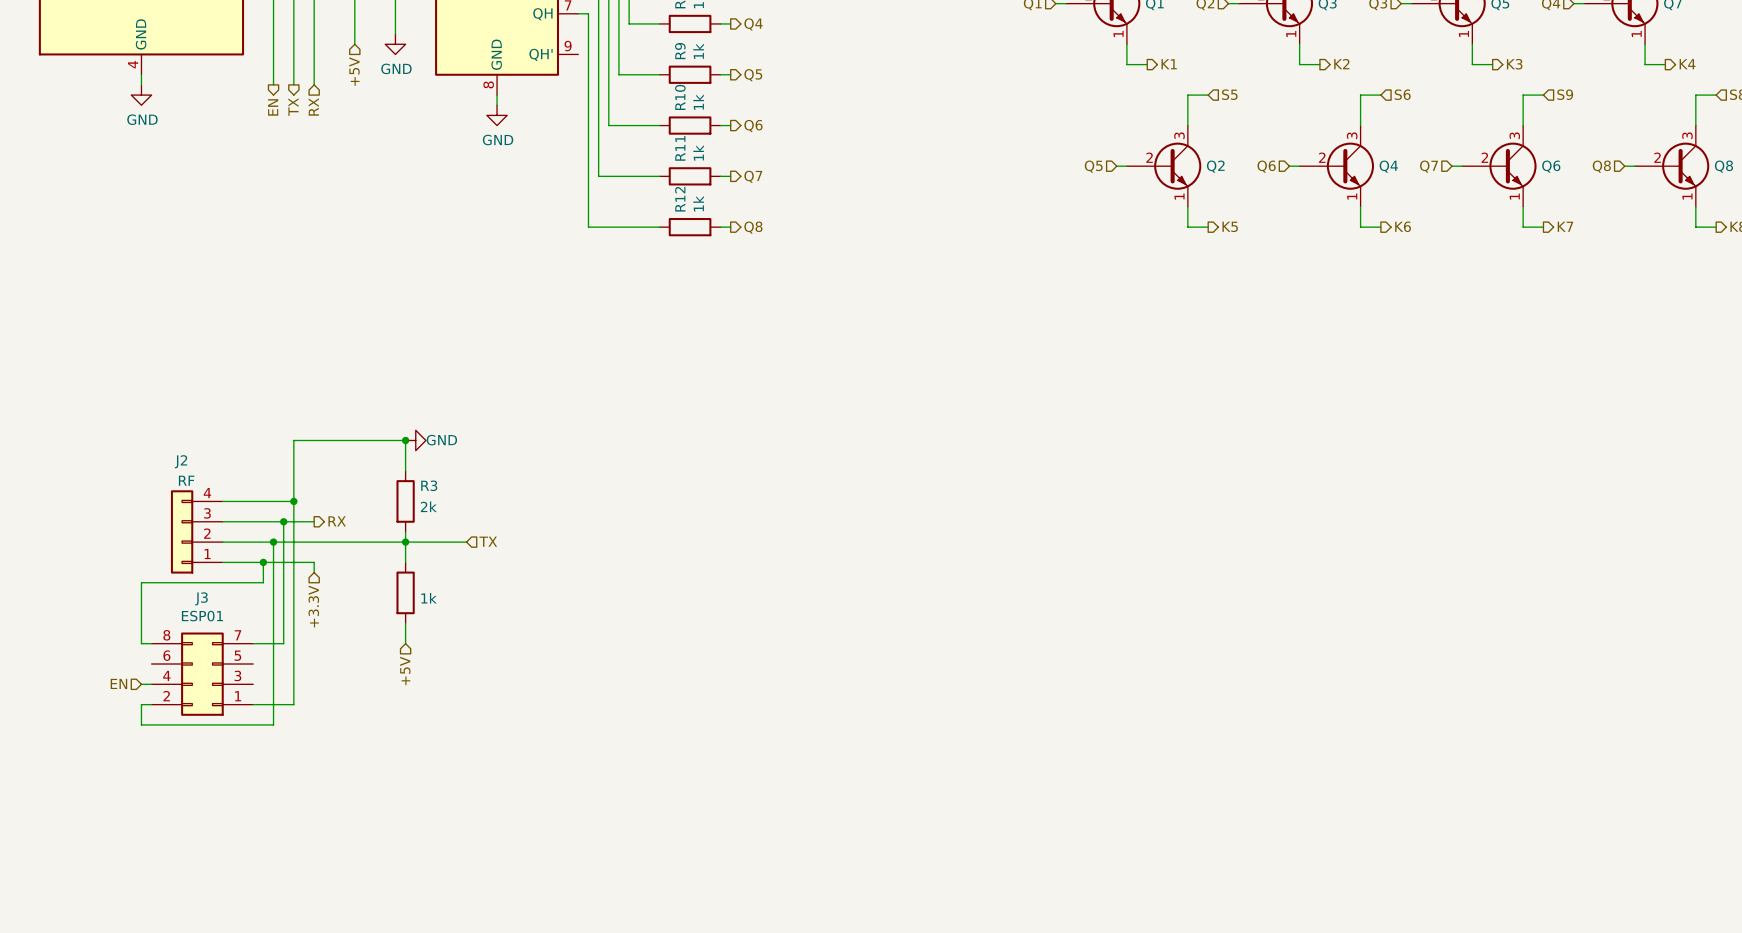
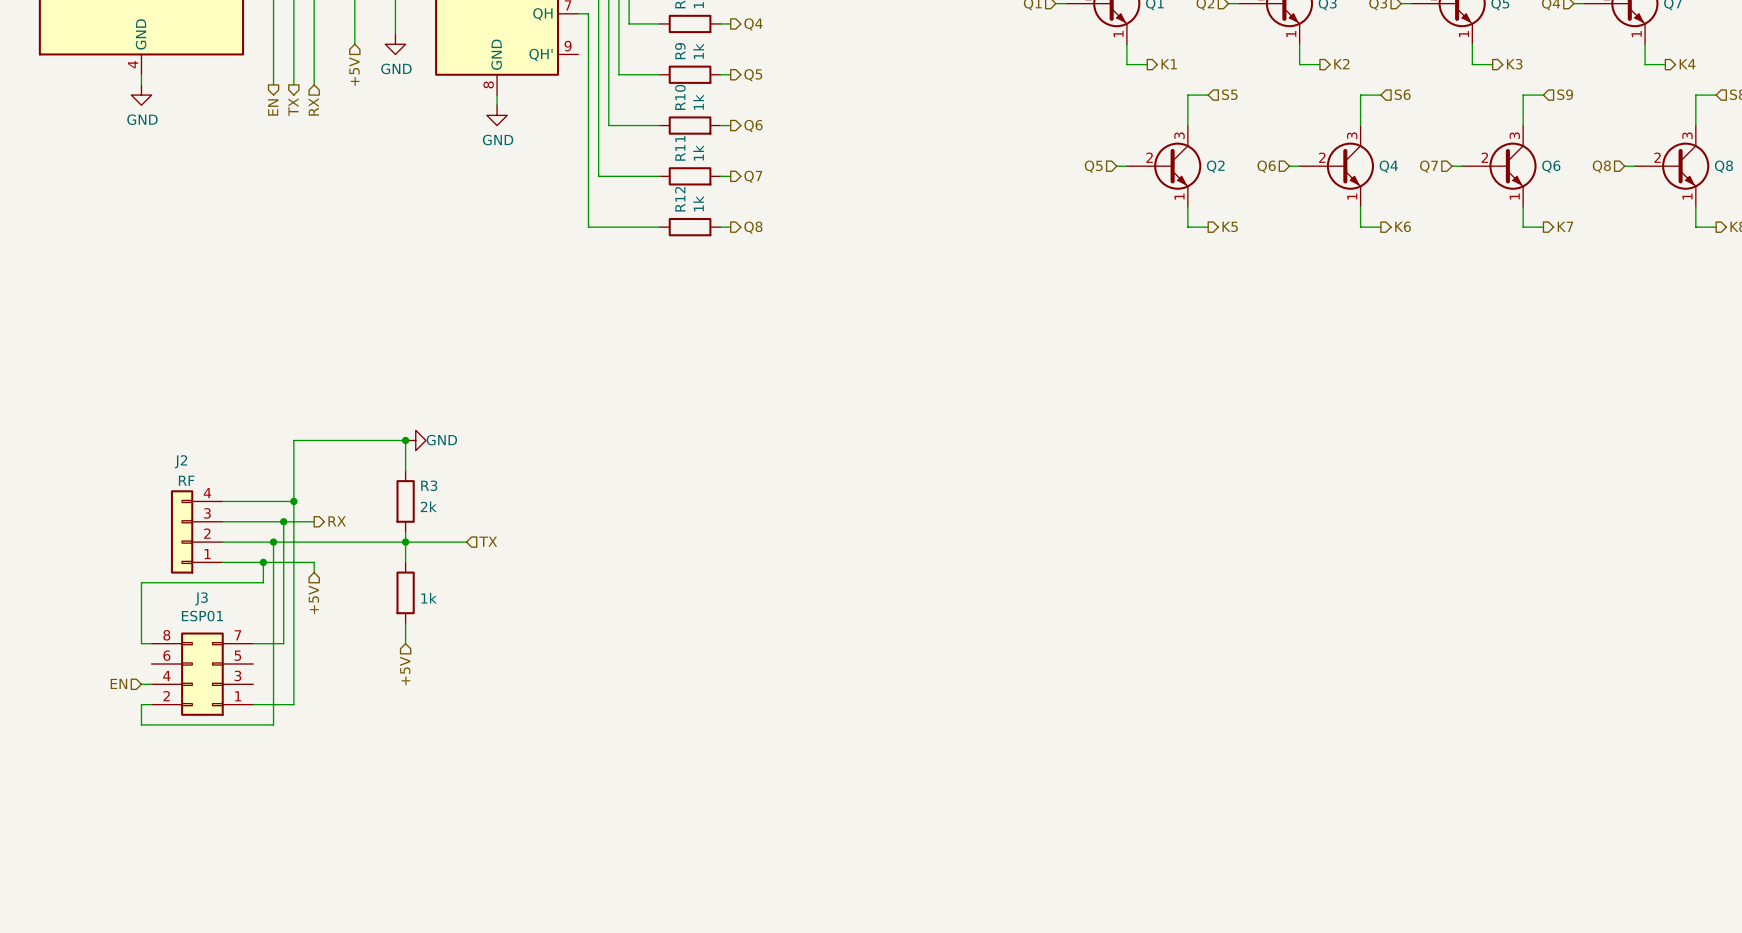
hierarchical label: +3.3V (313, 606) -> +5V (313, 599)

